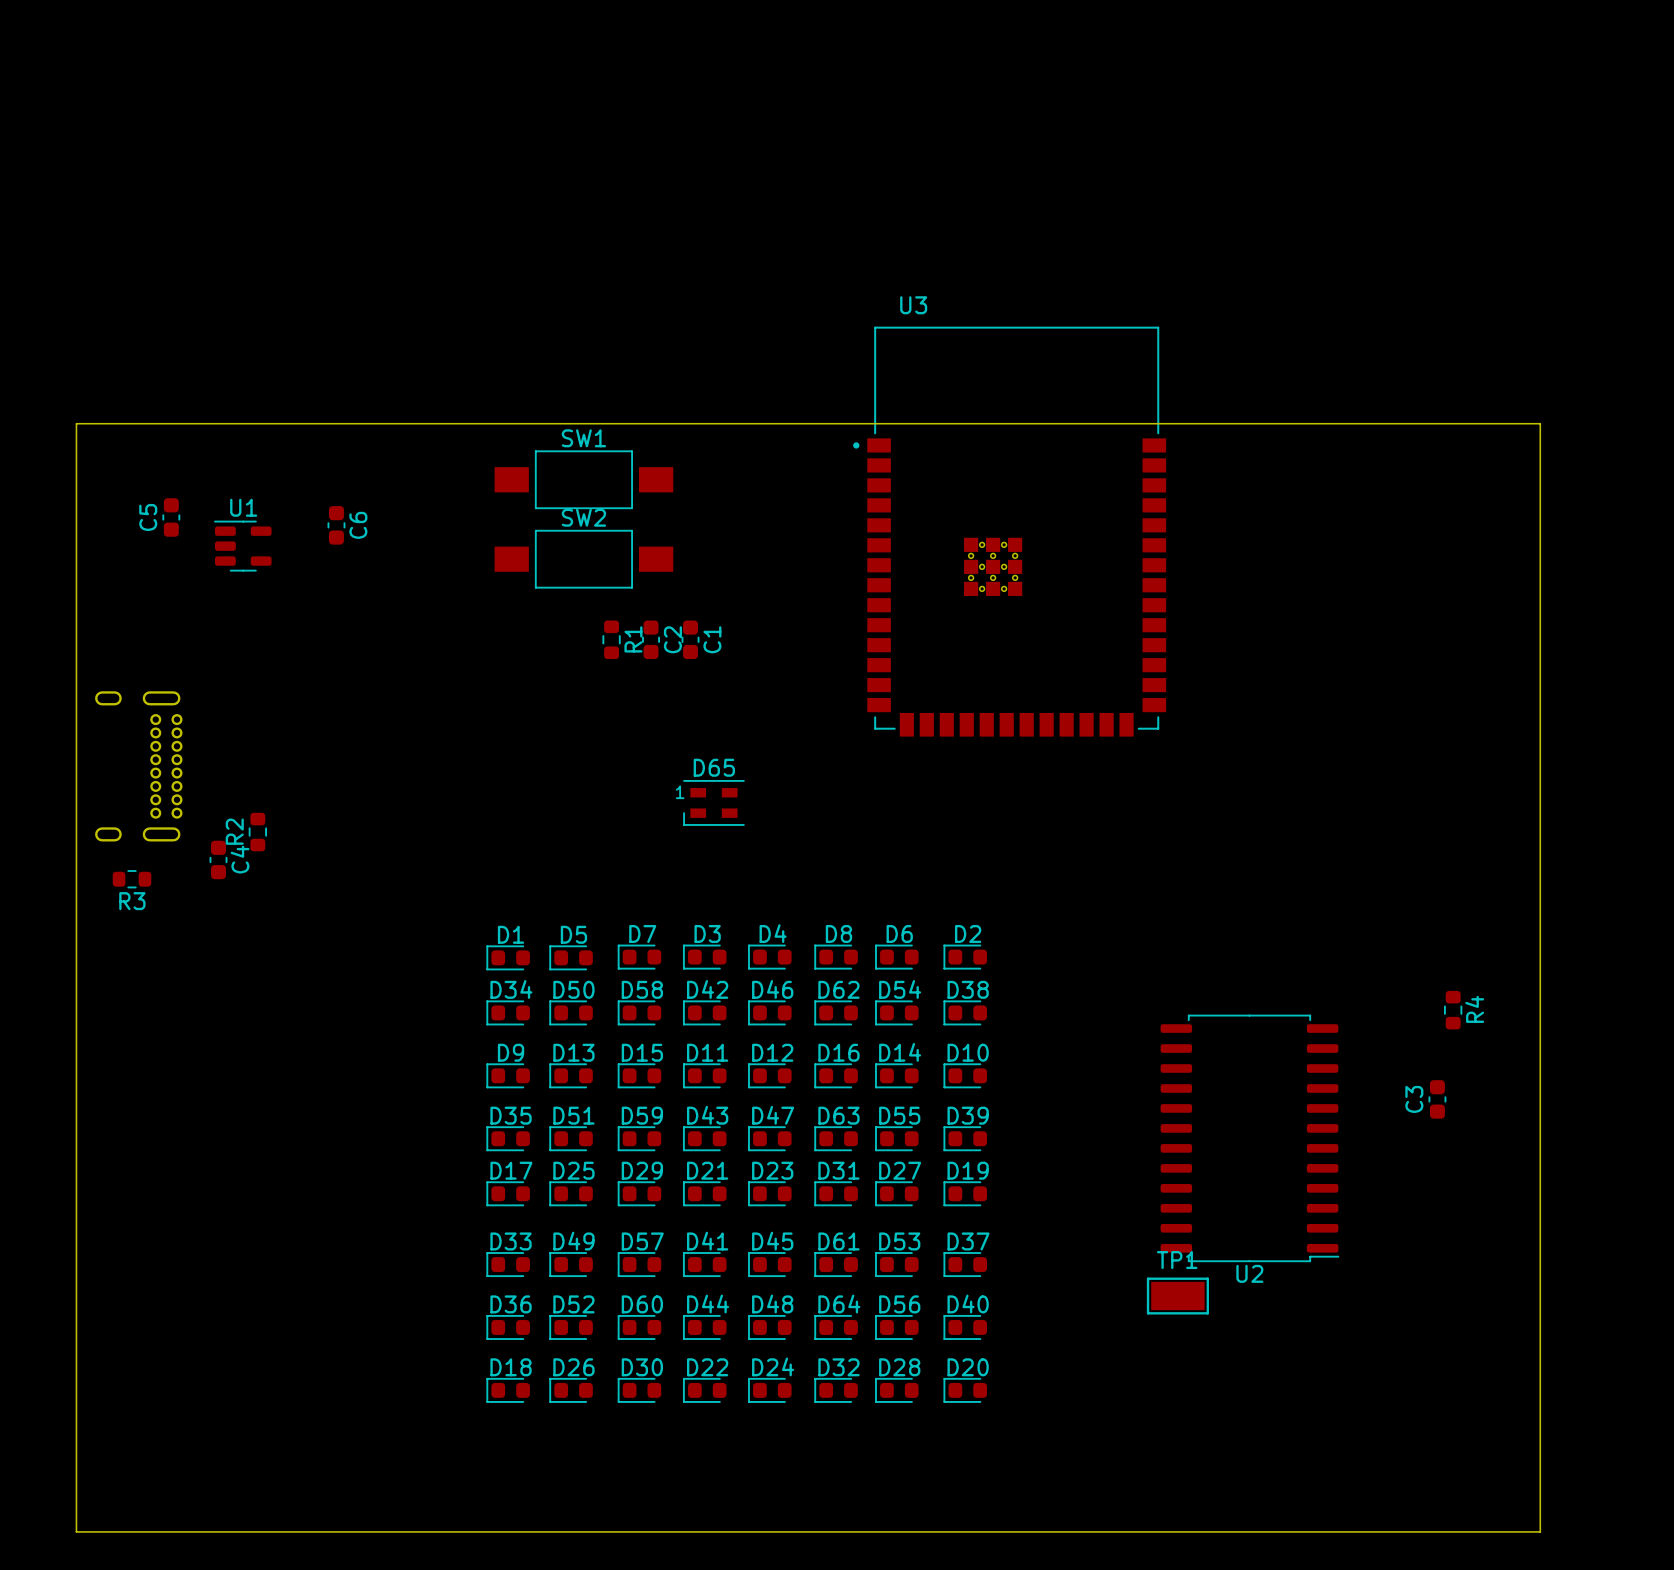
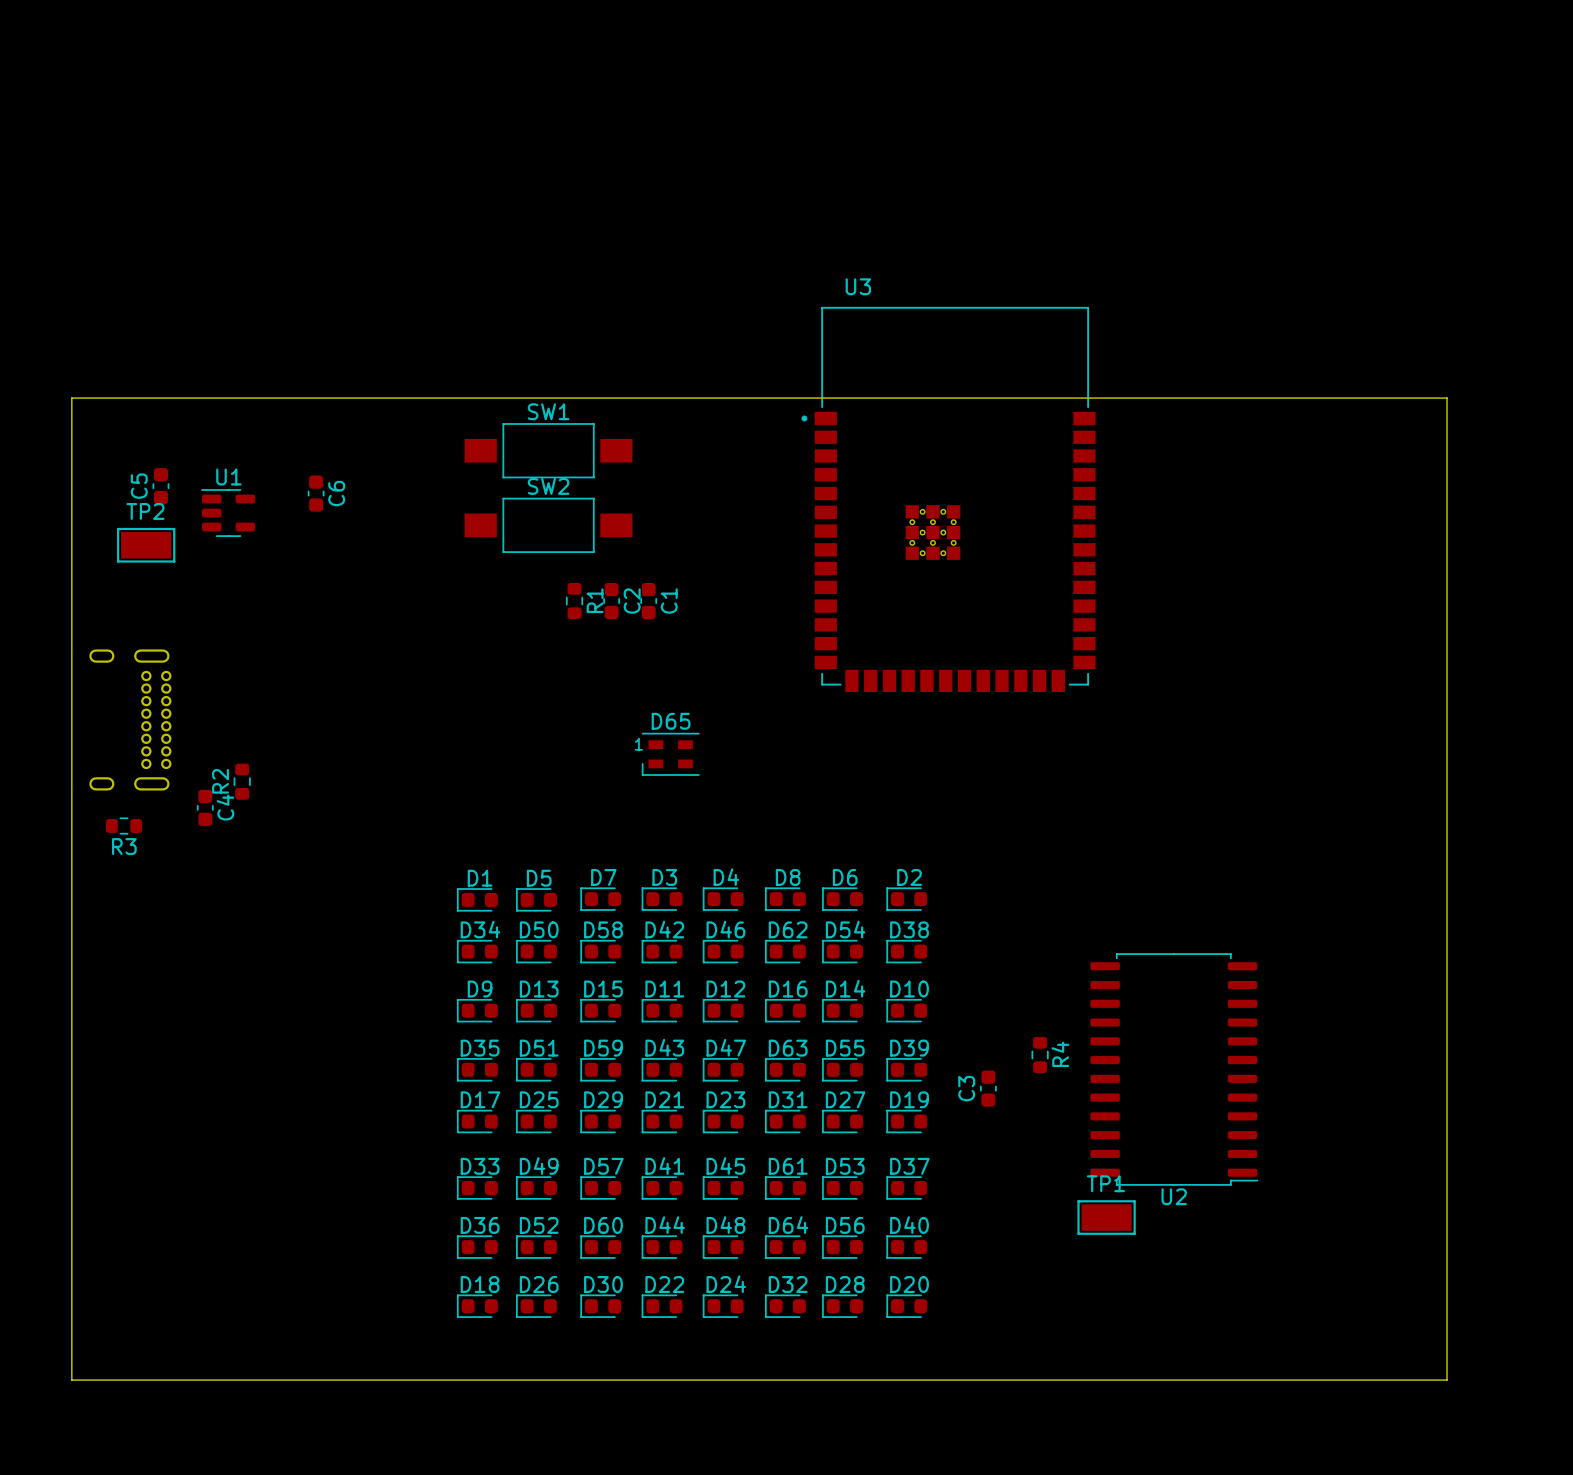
TP2: none -> (146, 545)
R4 position: (1453, 1010) -> (1040, 1055)
C3 position: (1437, 1099) -> (988, 1088)
board edge: (76, 1469) (76, 1531) (1540, 1531) (1540, 1469) -> (71, 1380) (1447, 1380)

